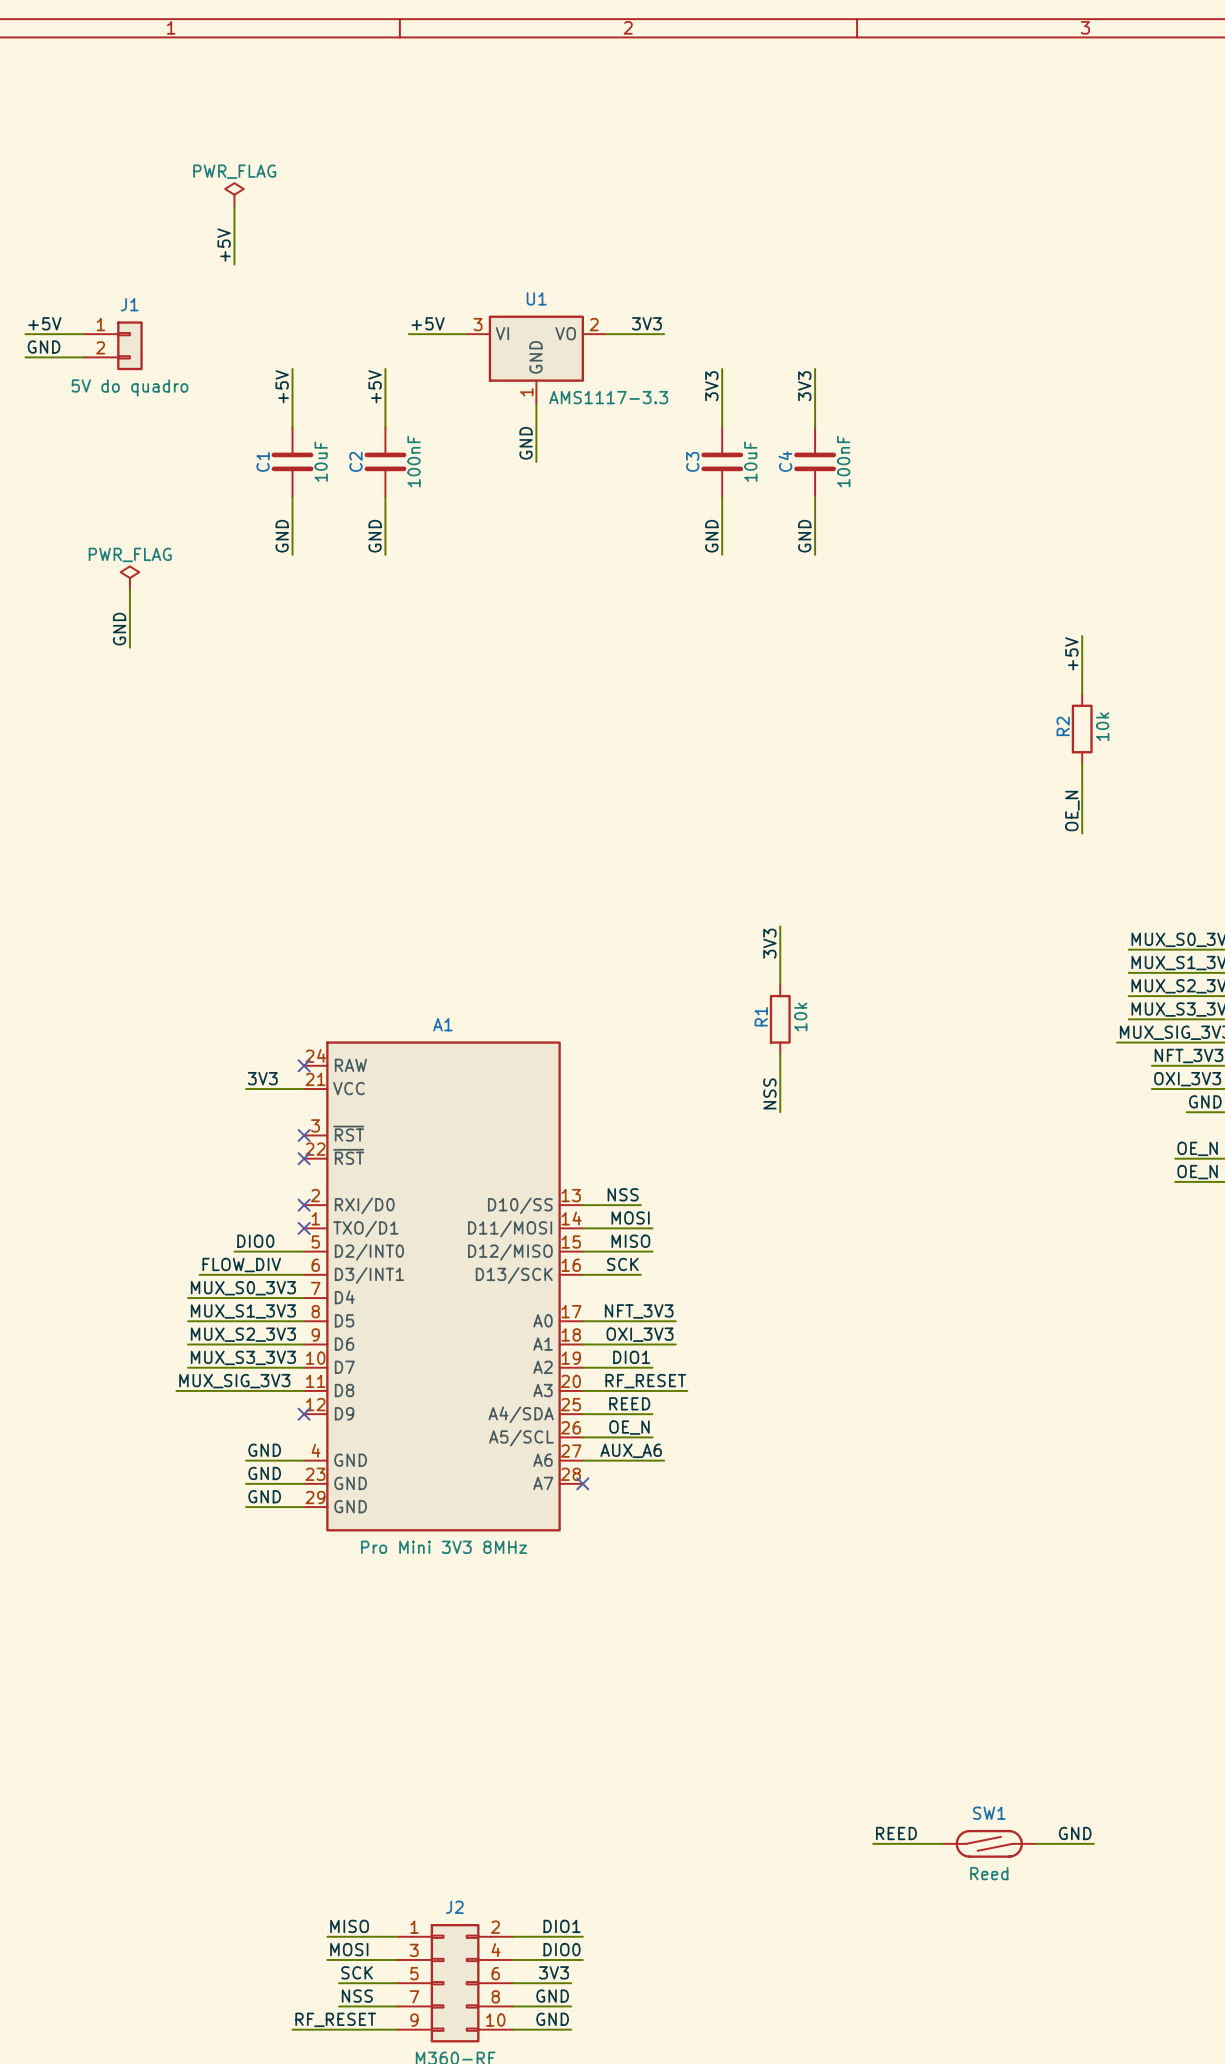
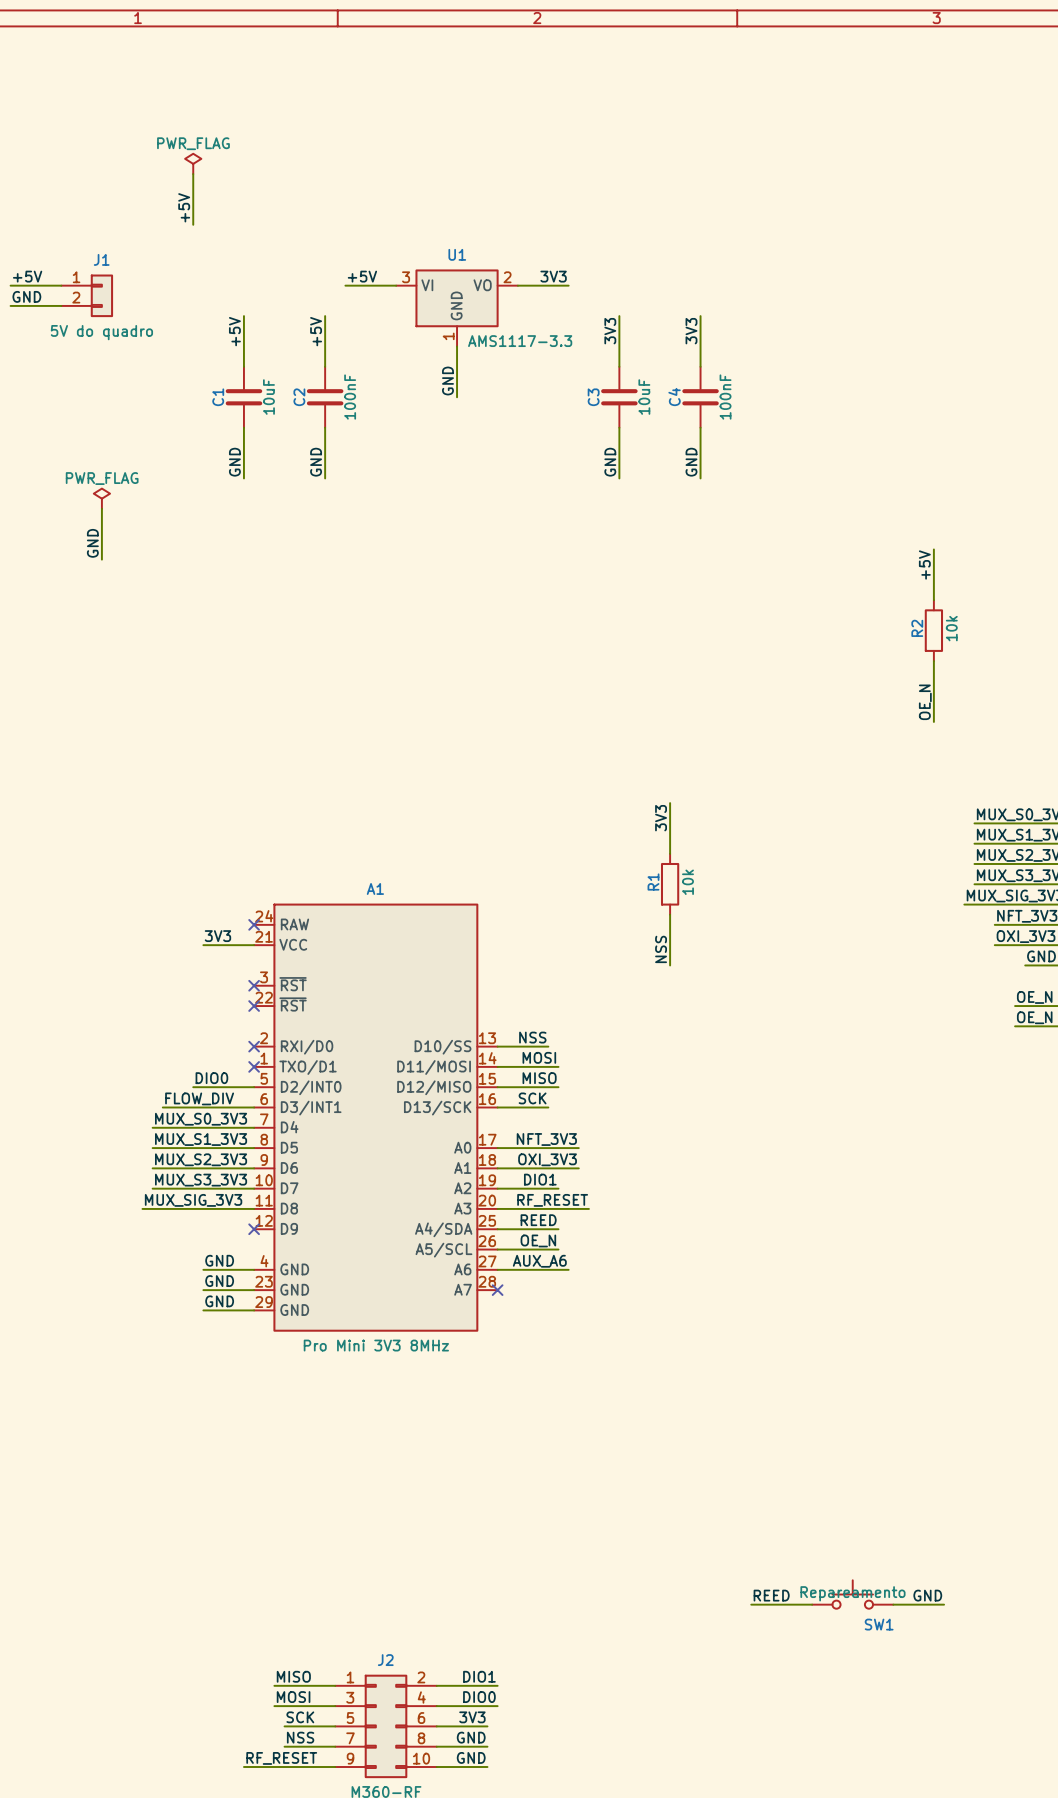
SW1 name position: SW1 (989, 1813) -> SW1 (879, 1624)
SW1 symbol: [942, 1829, 1036, 1858] -> [812, 1580, 894, 1609]
SW1 value: Reed (989, 1873) -> Repareamento (852, 1593)

